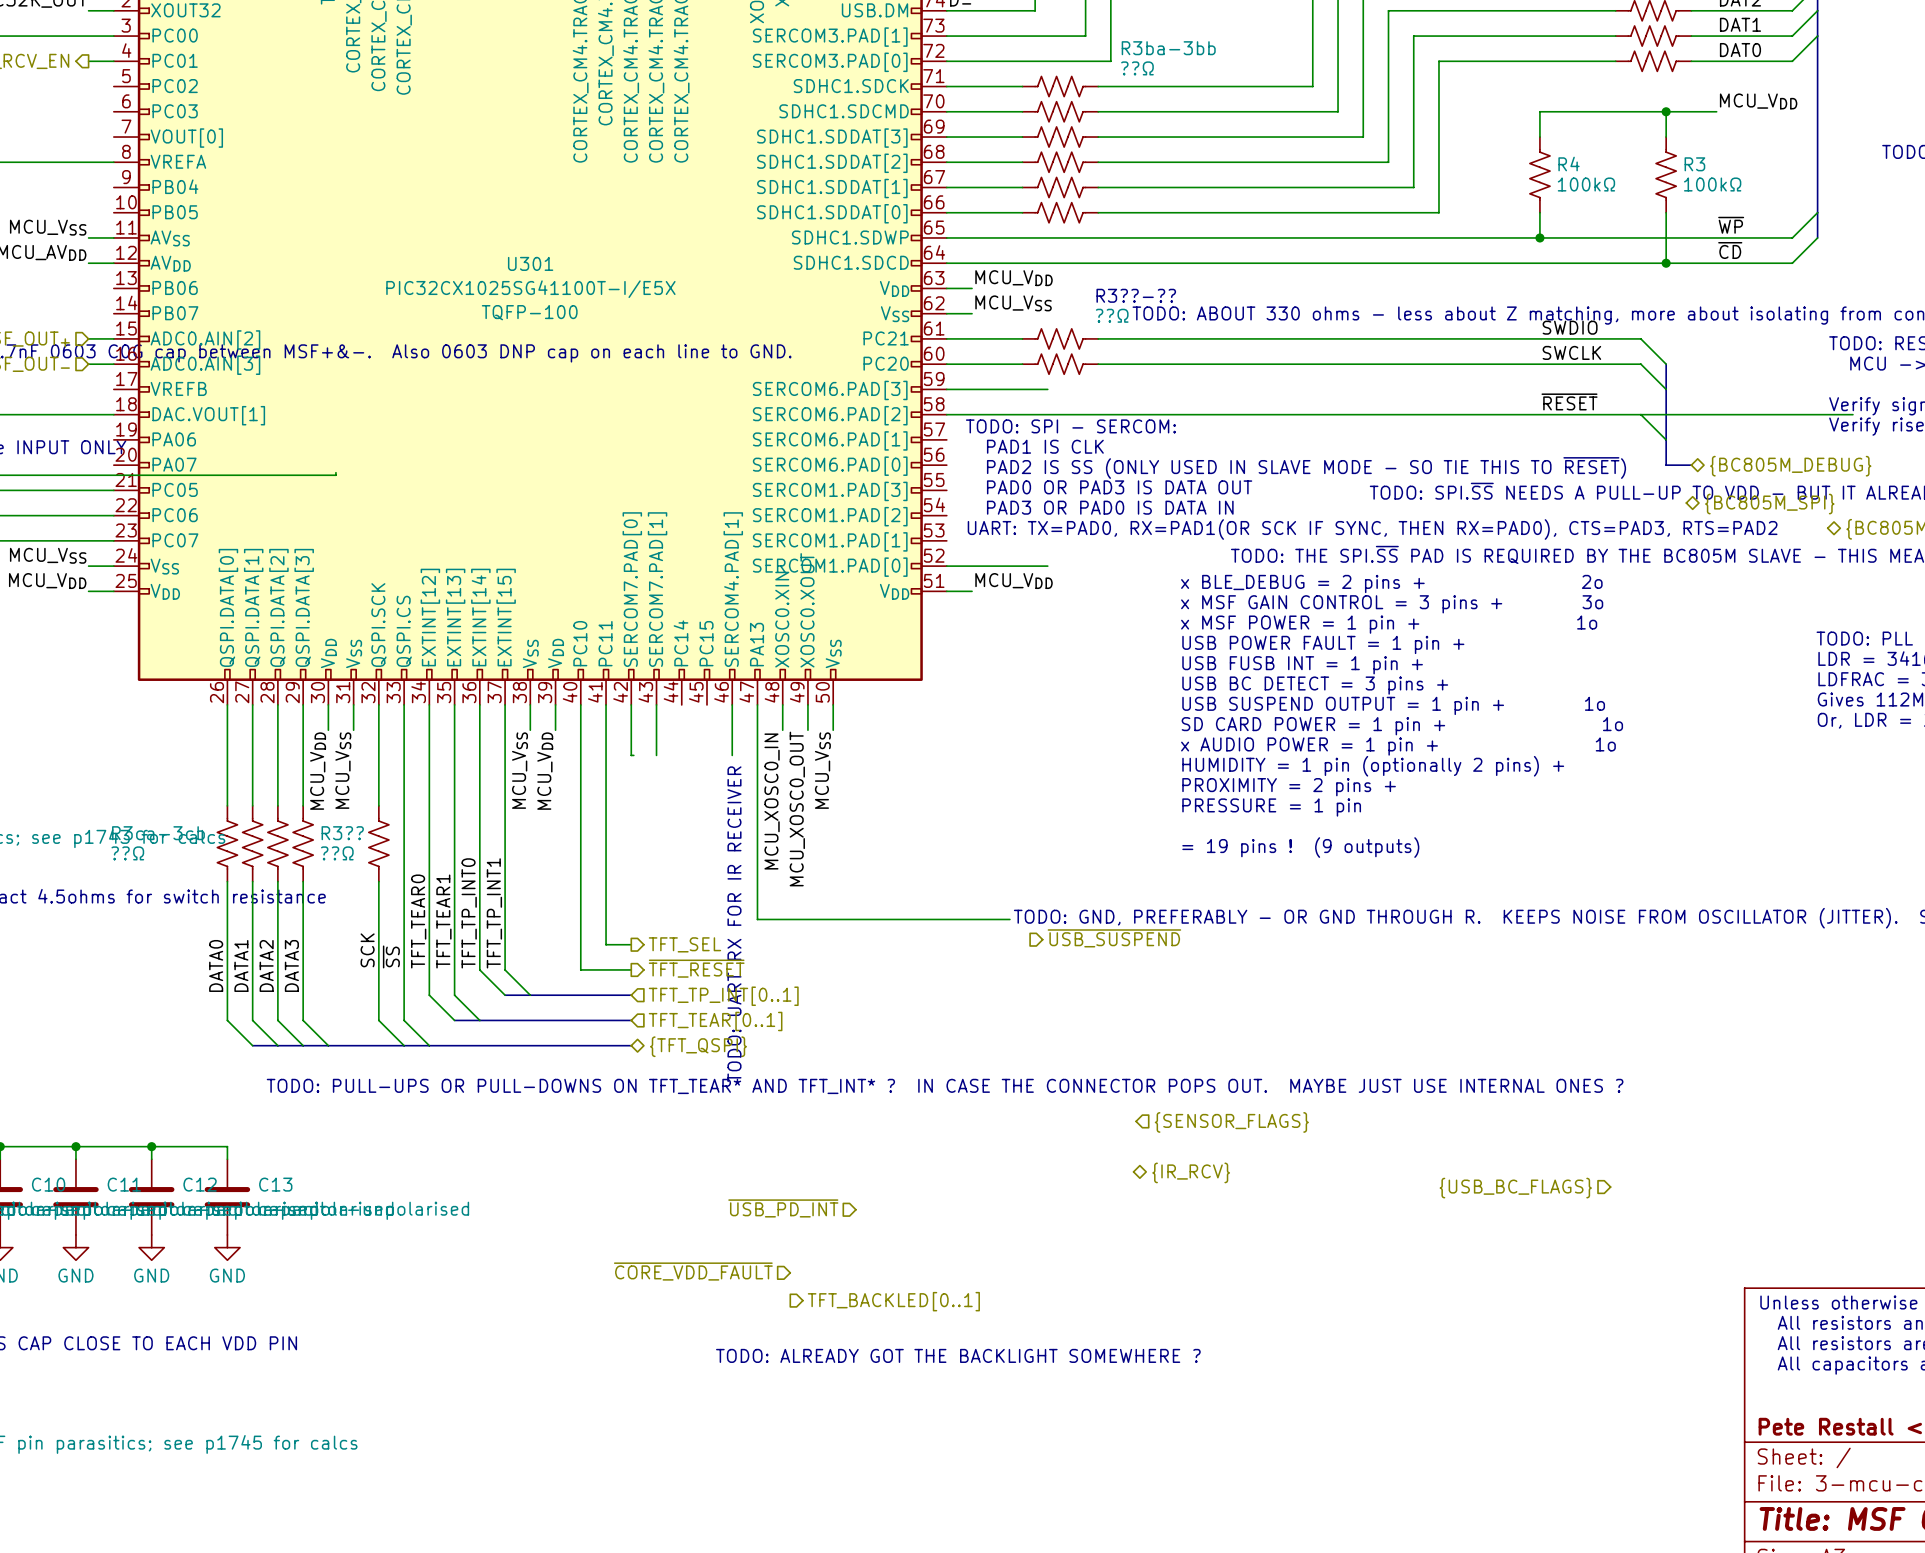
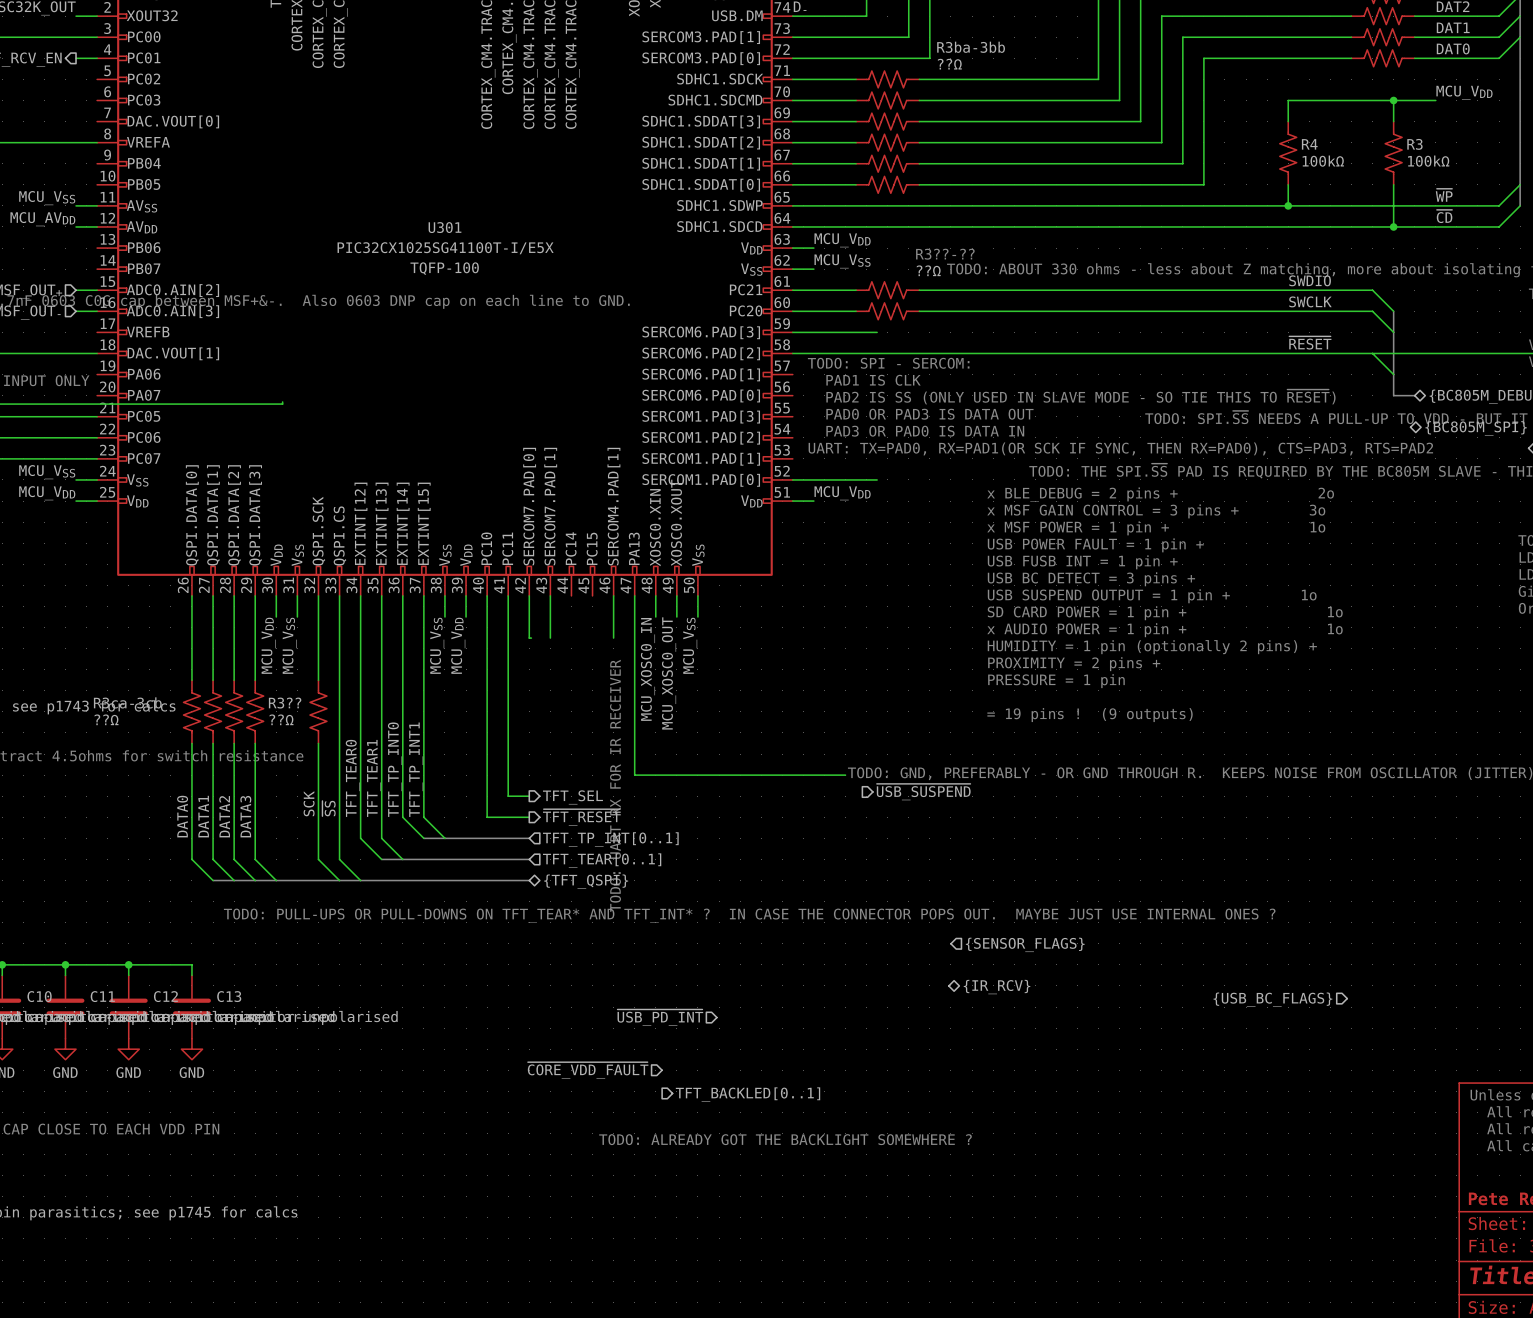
U301 pin name: VOUT[0] (186, 138) -> DAC.VOUT[0] (173, 121)

